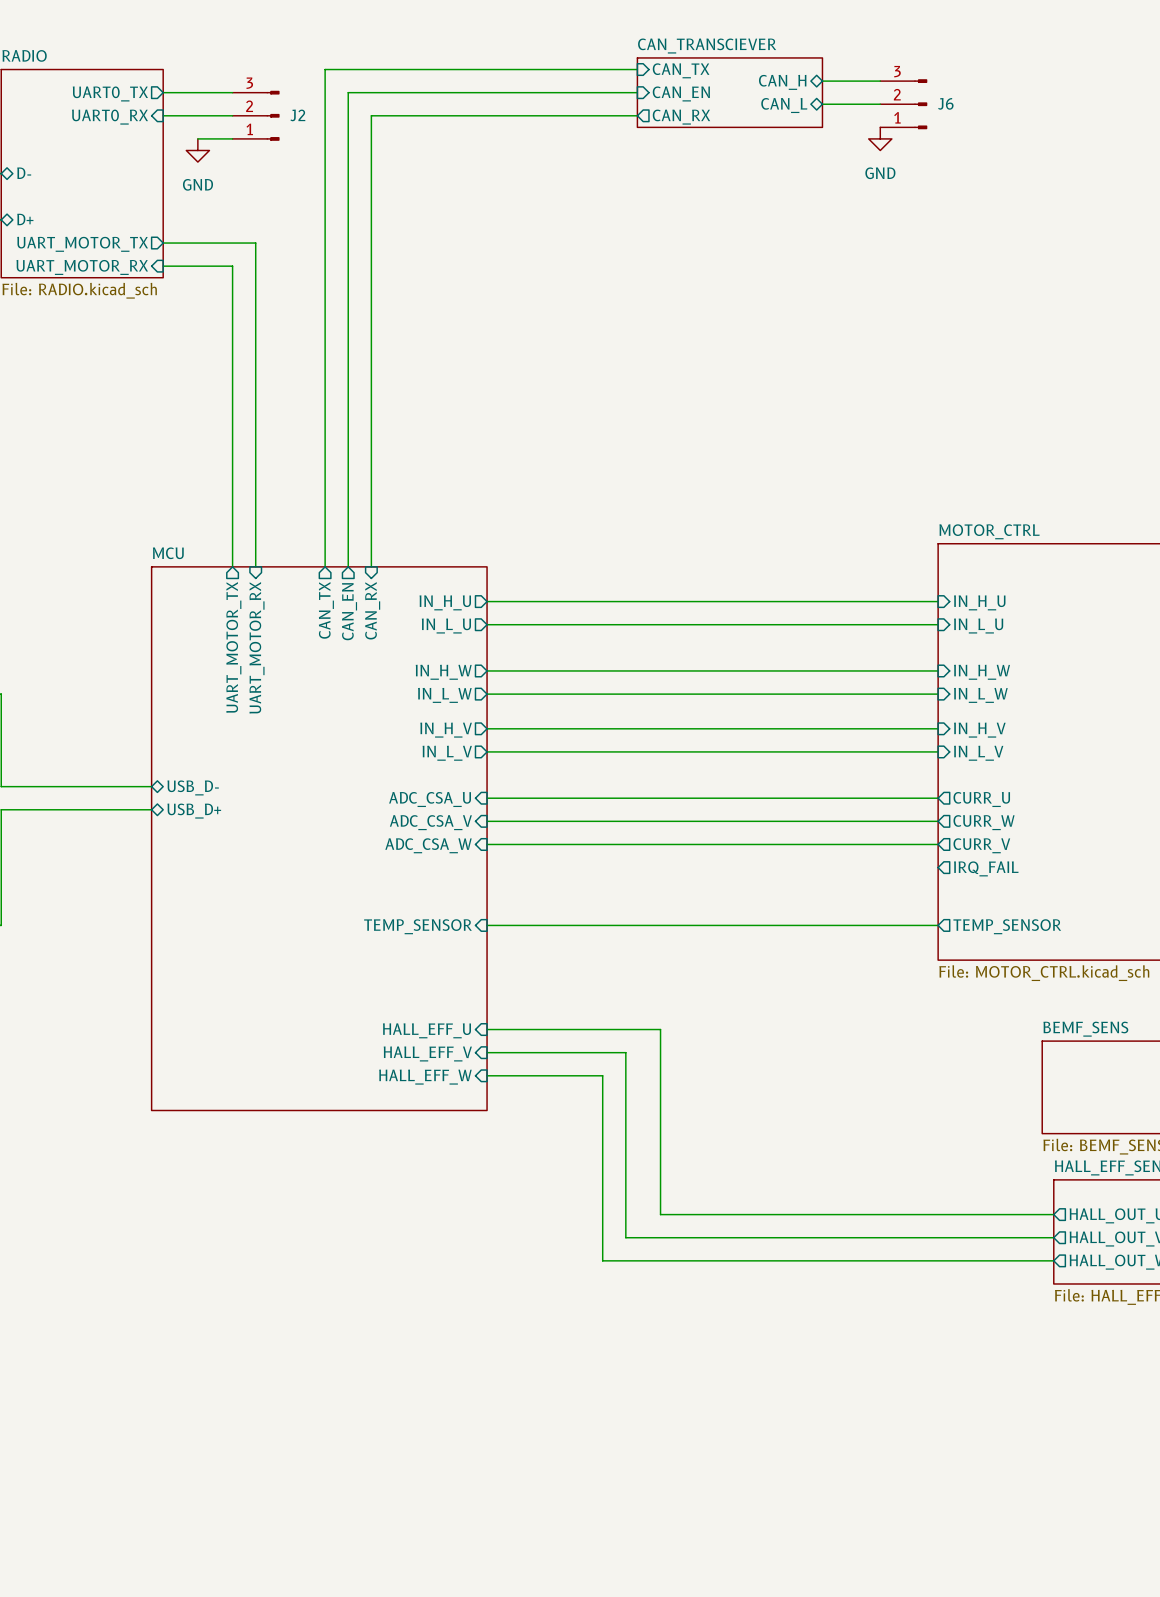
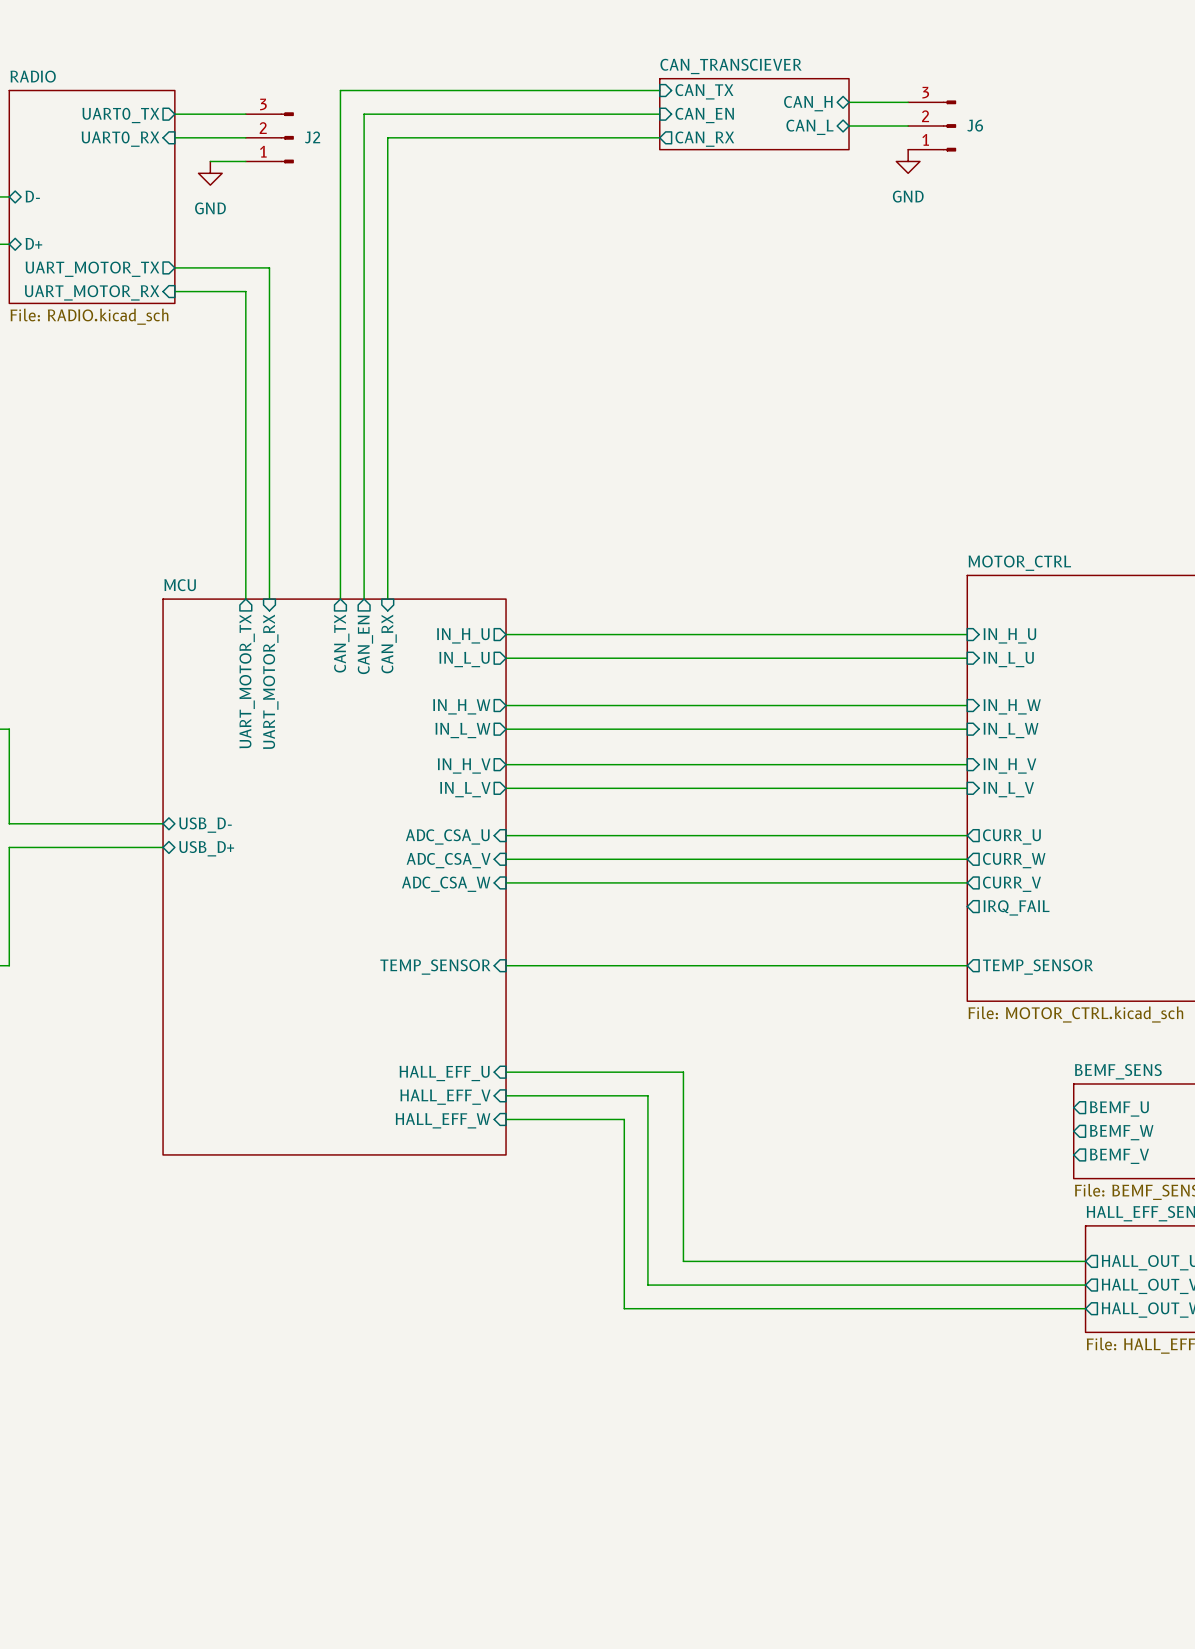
sheet pin: none -> BEMF_U (1119, 1108)
sheet pin: none -> BEMF_W (1121, 1132)
sheet pin: none -> BEMF_V (1119, 1156)

